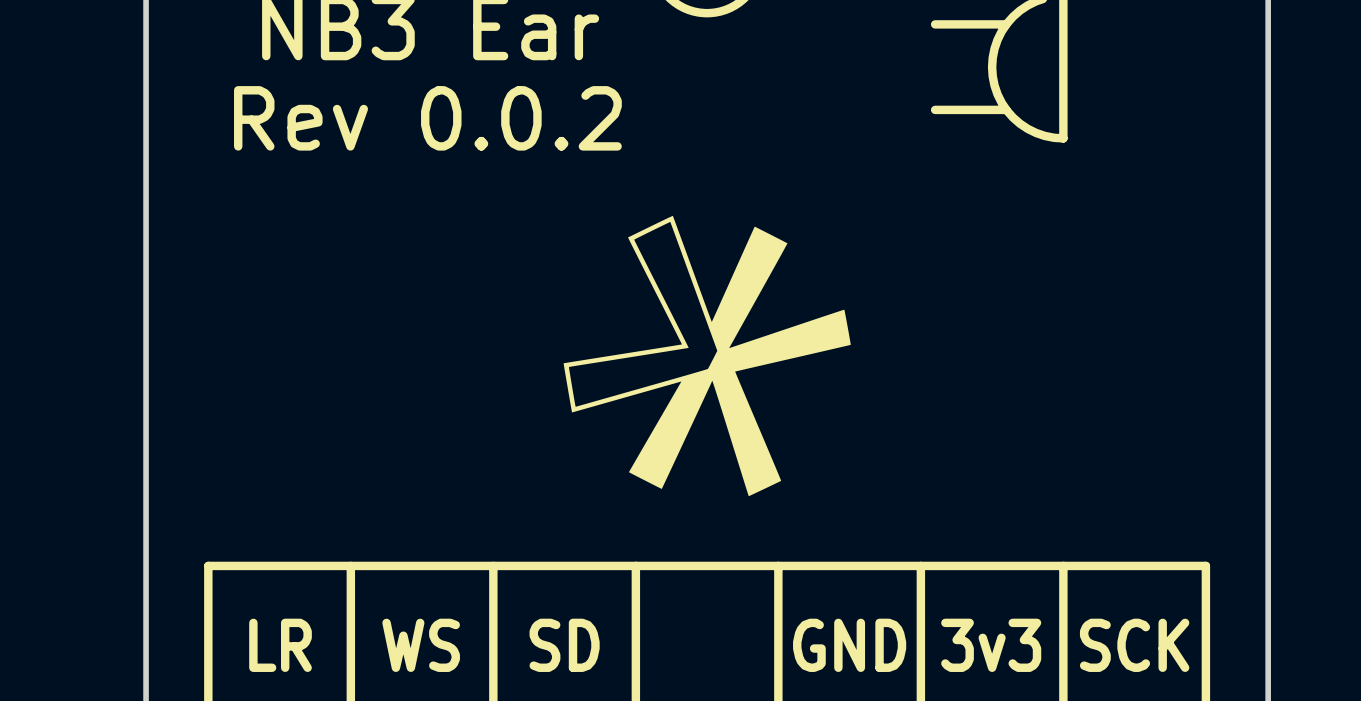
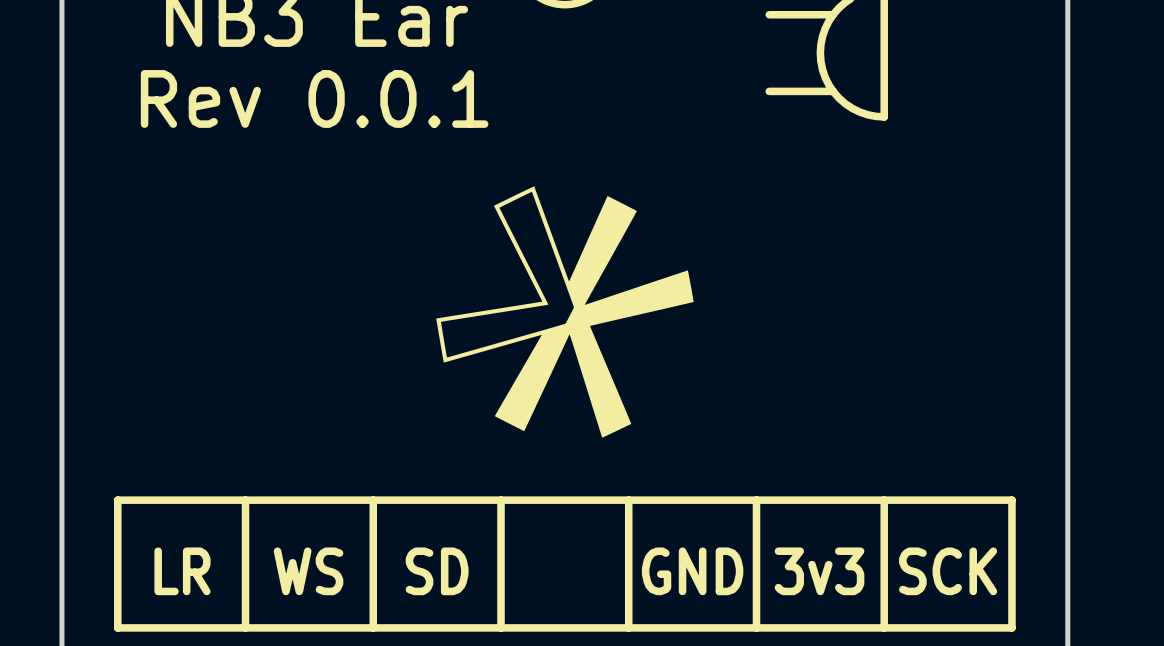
text: Rev 0.0.2 (427, 118) -> Rev 0.0.1 (314, 98)

